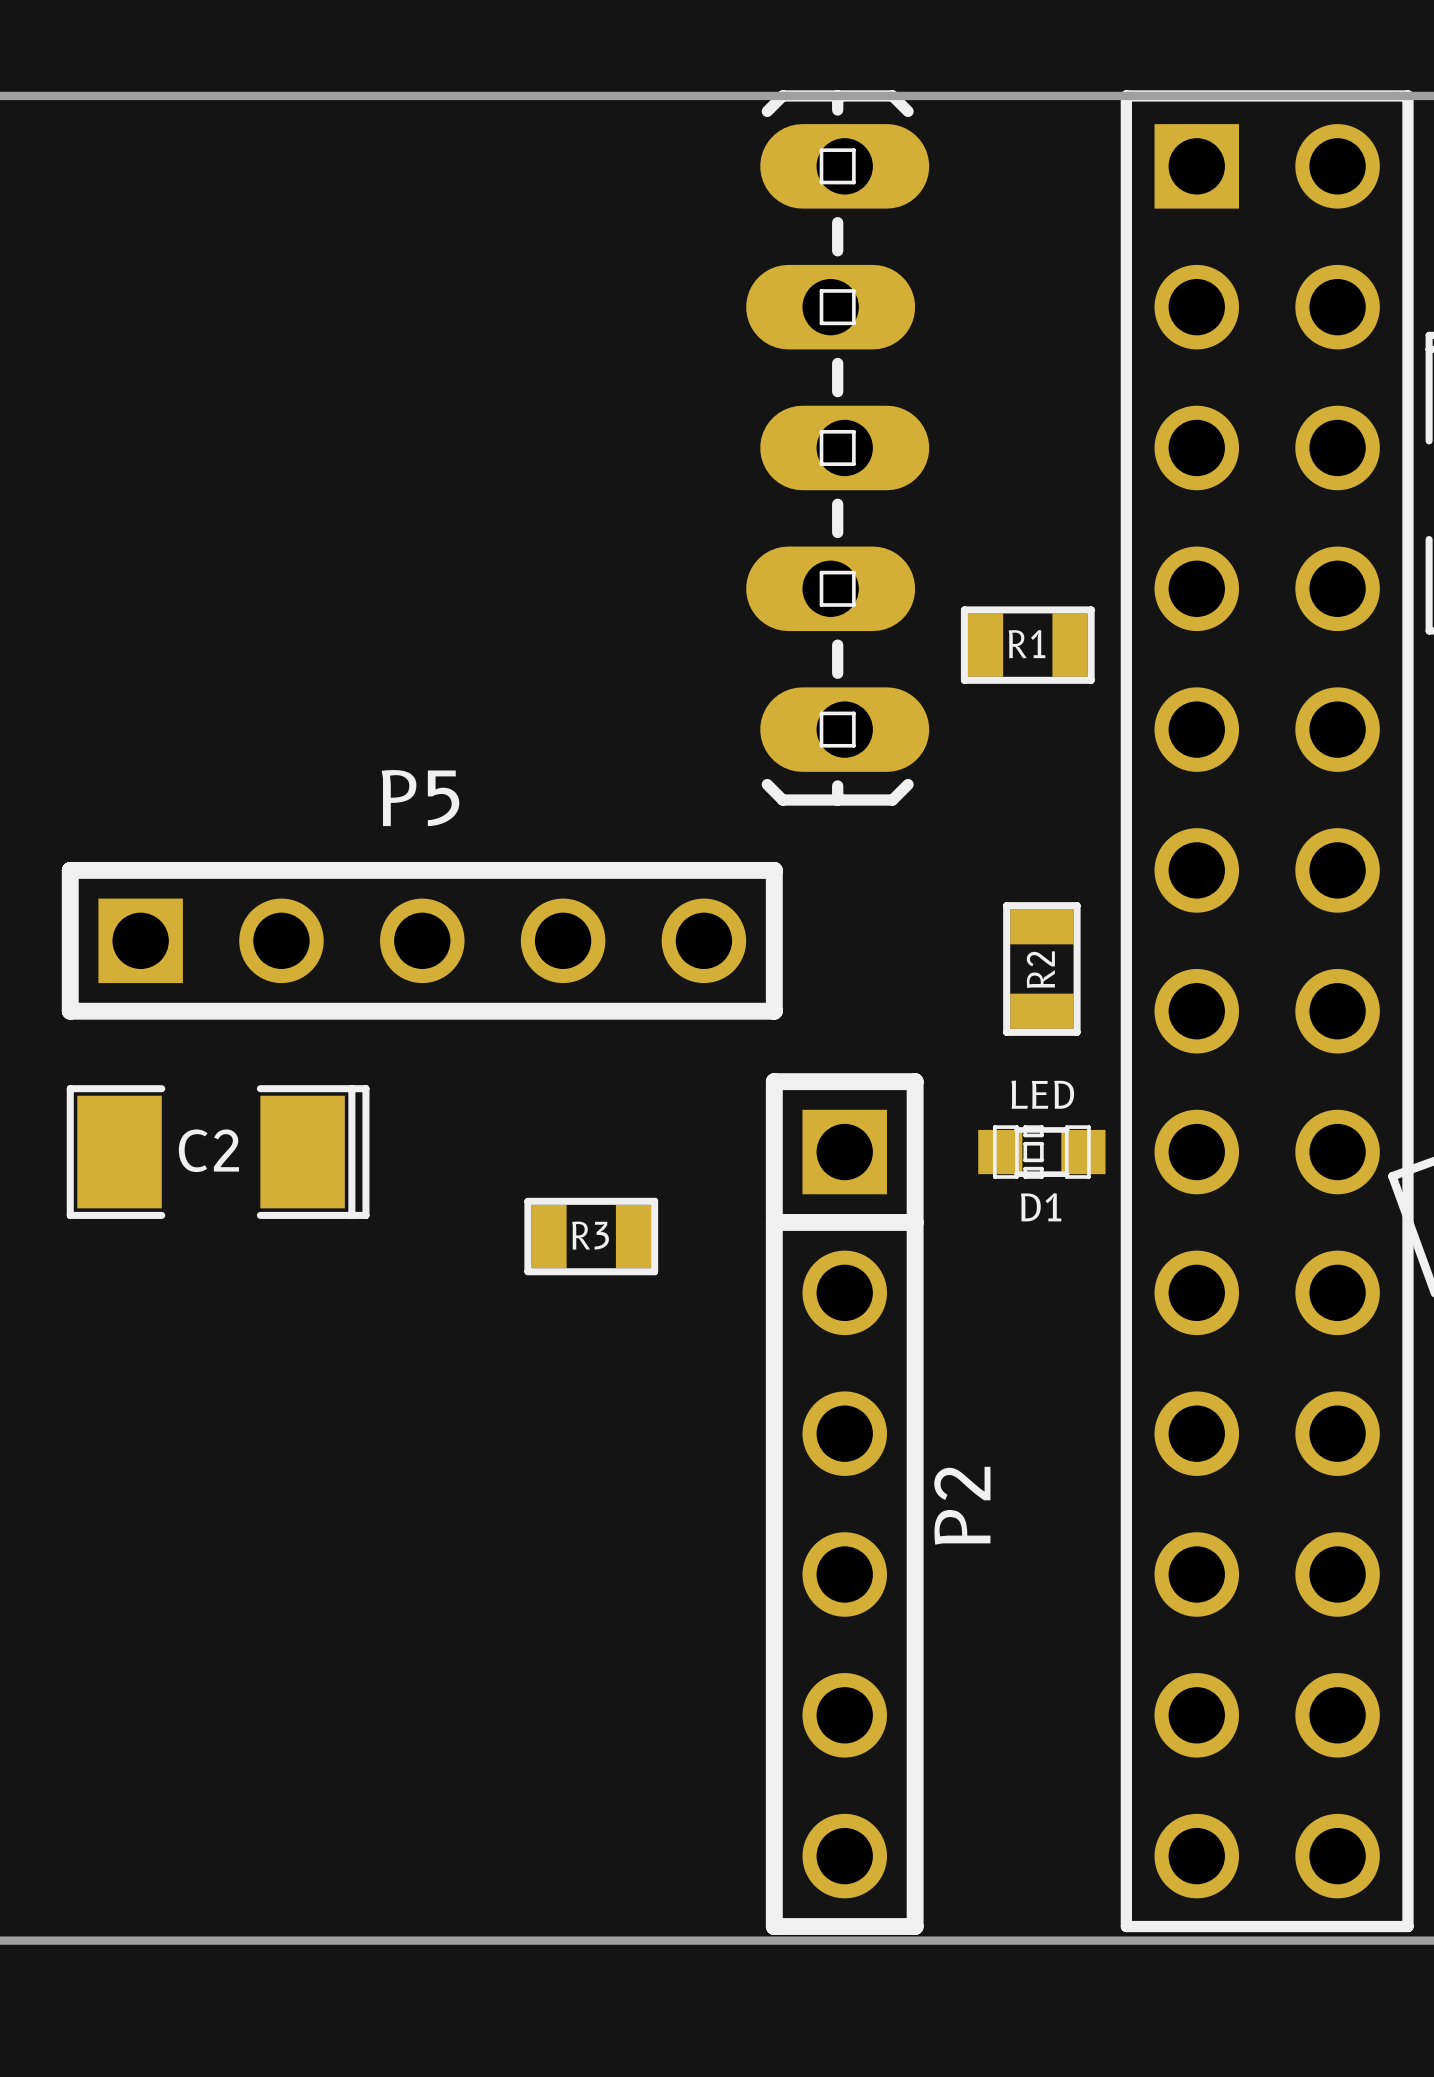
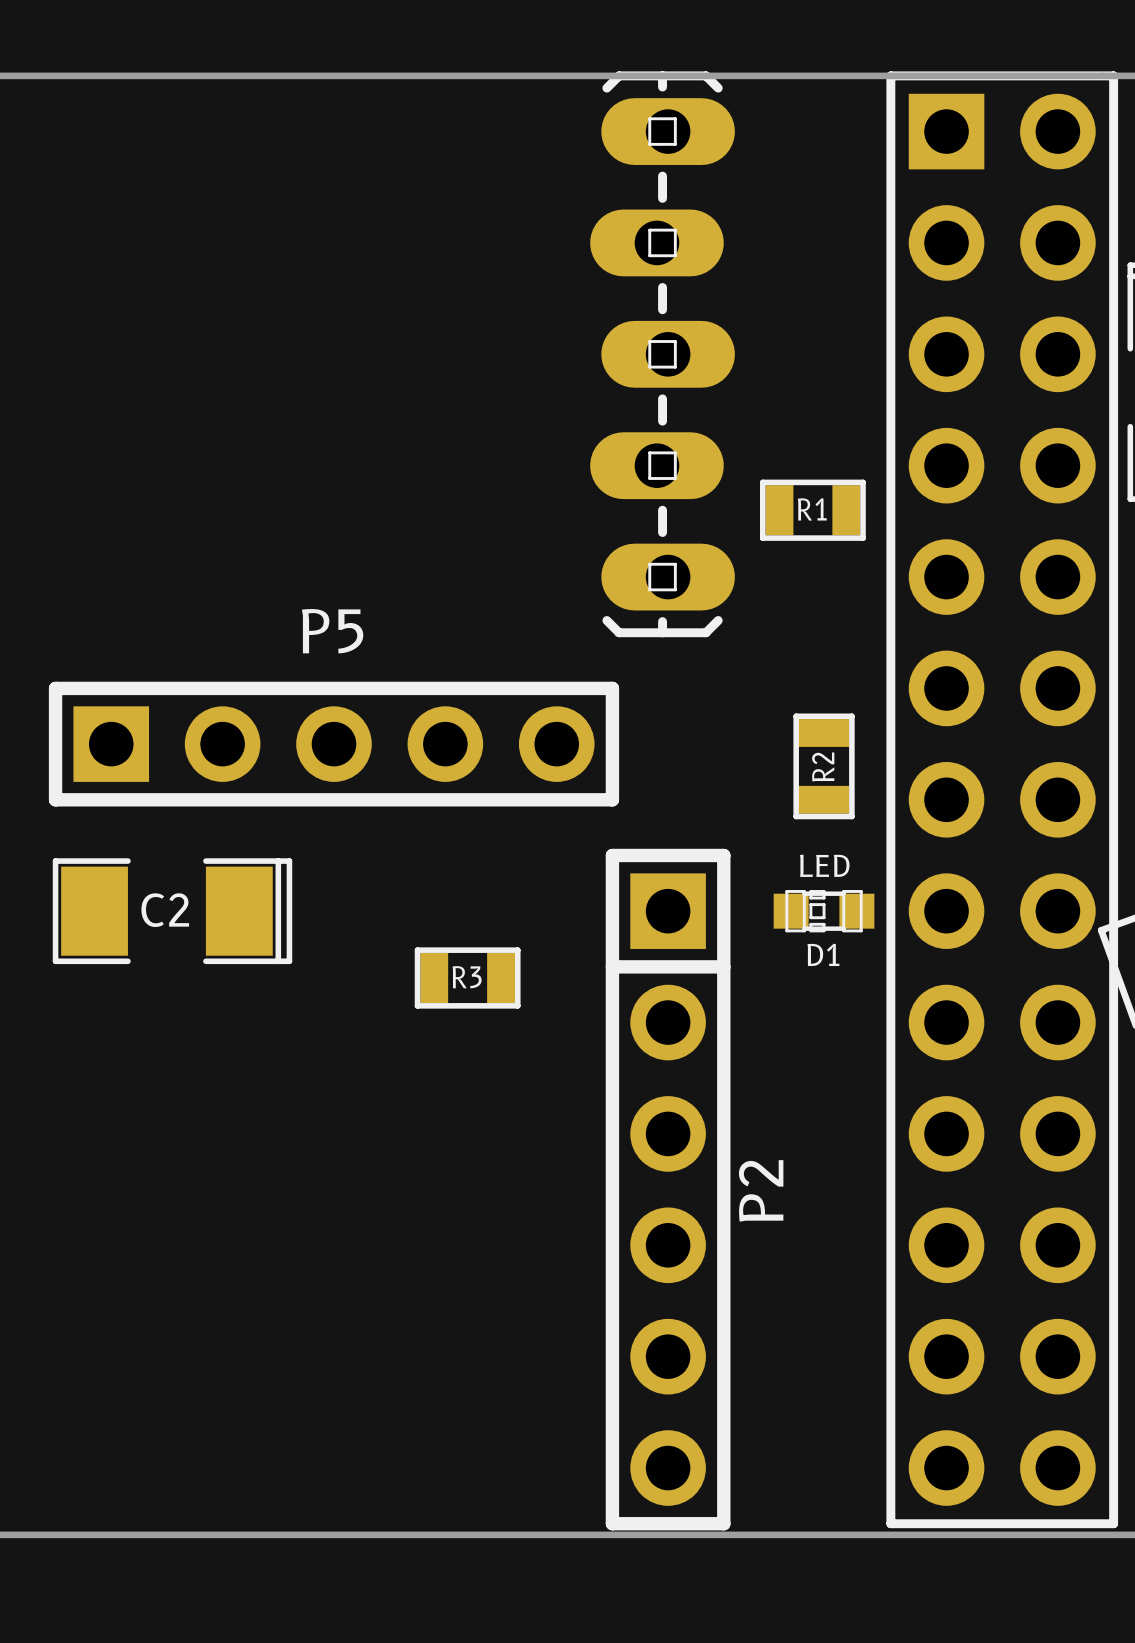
part footprint: [1120, 90, 1414, 1933] -> [886, 71, 1119, 1529]
P5 footprint: [61, 861, 783, 1020] -> [48, 681, 620, 807]
P2 footprint: [765, 1073, 924, 1935] -> [605, 848, 731, 1531]

